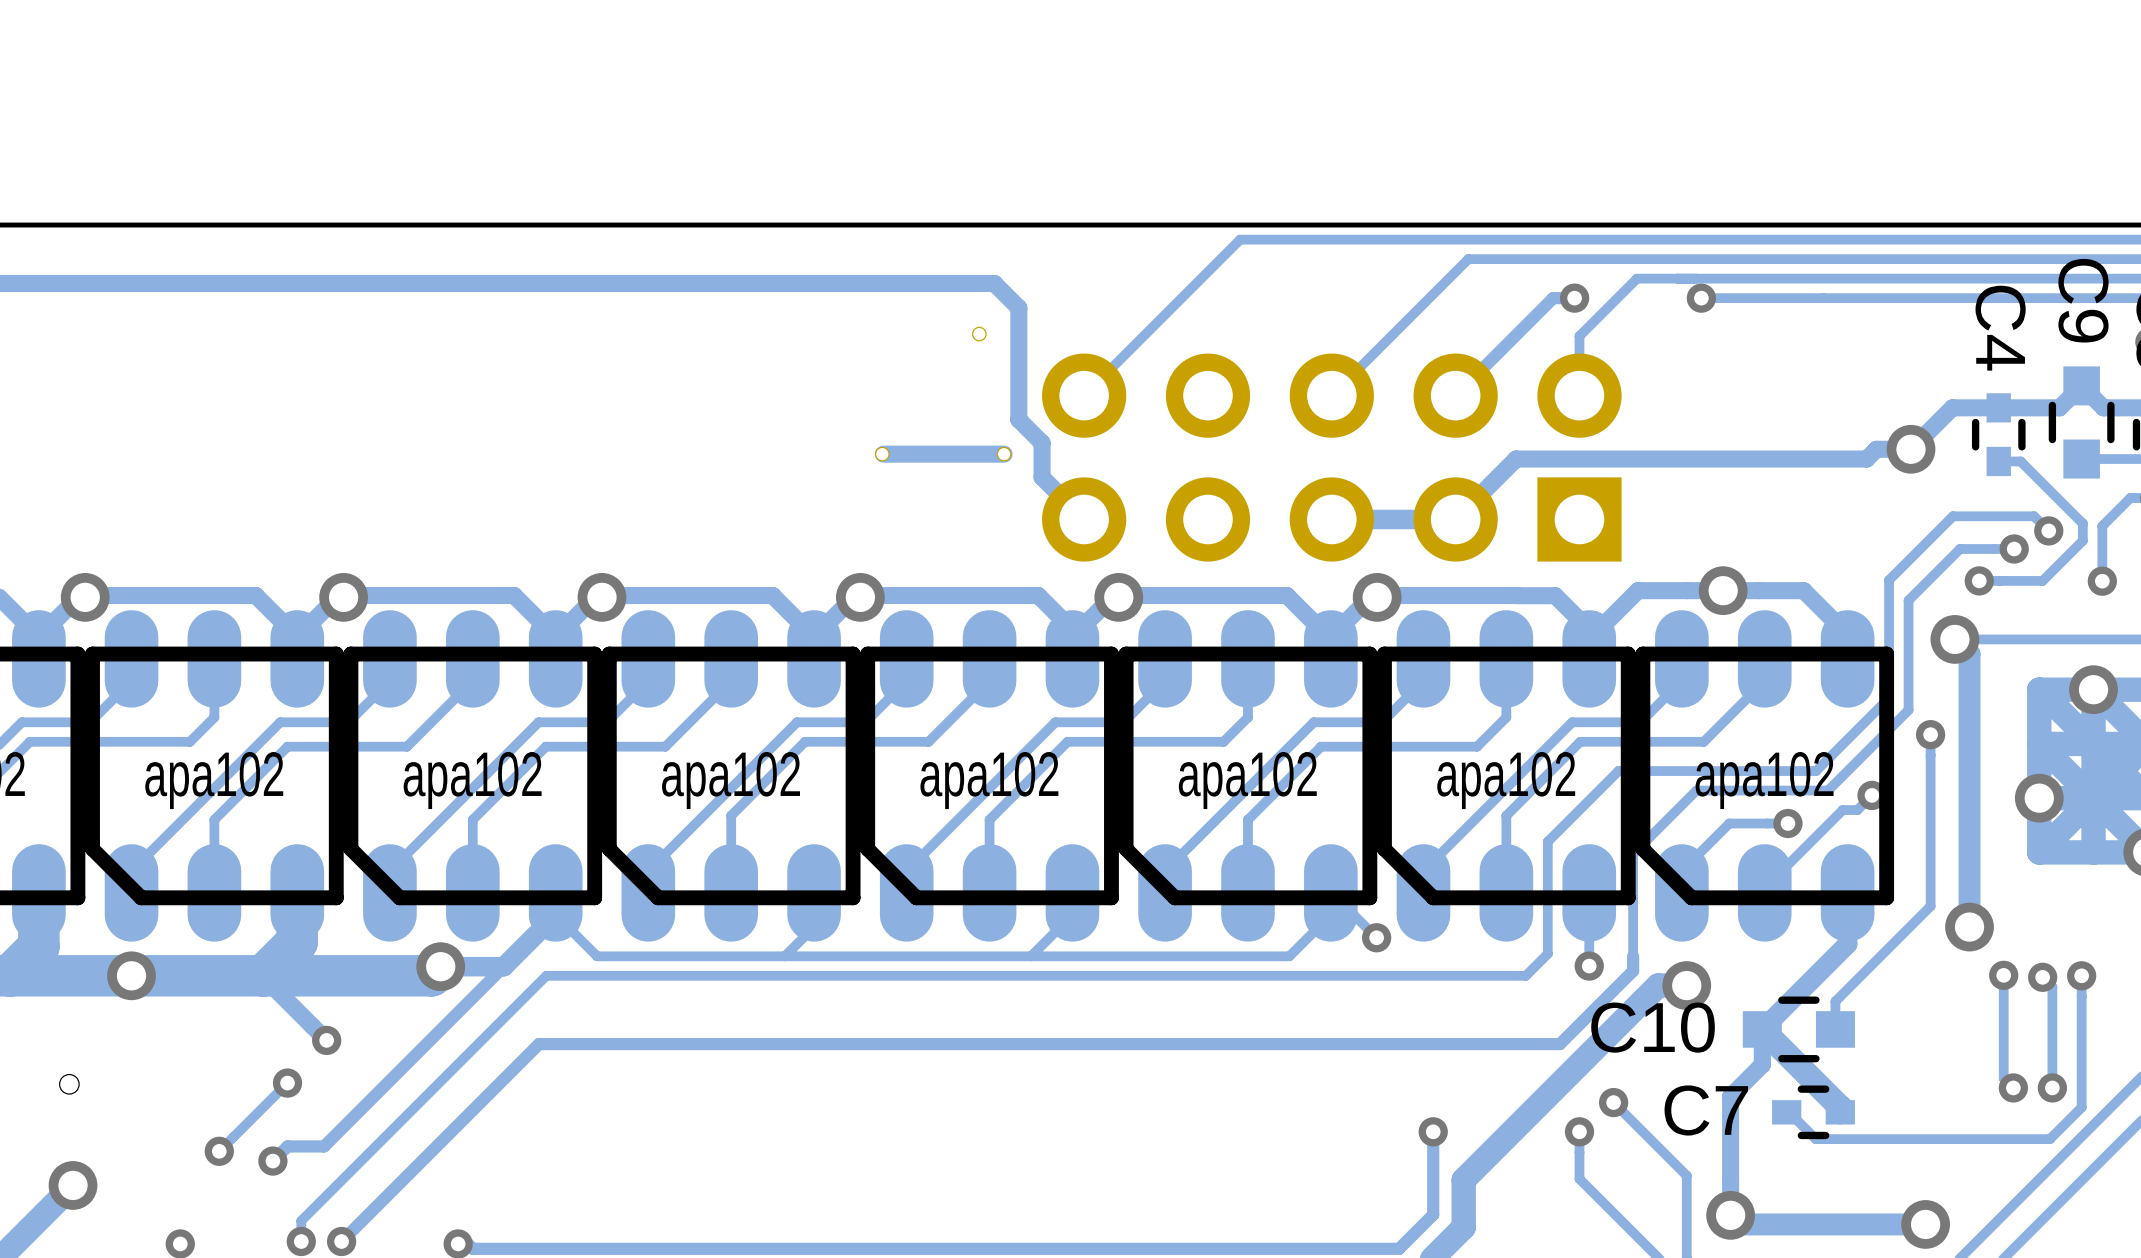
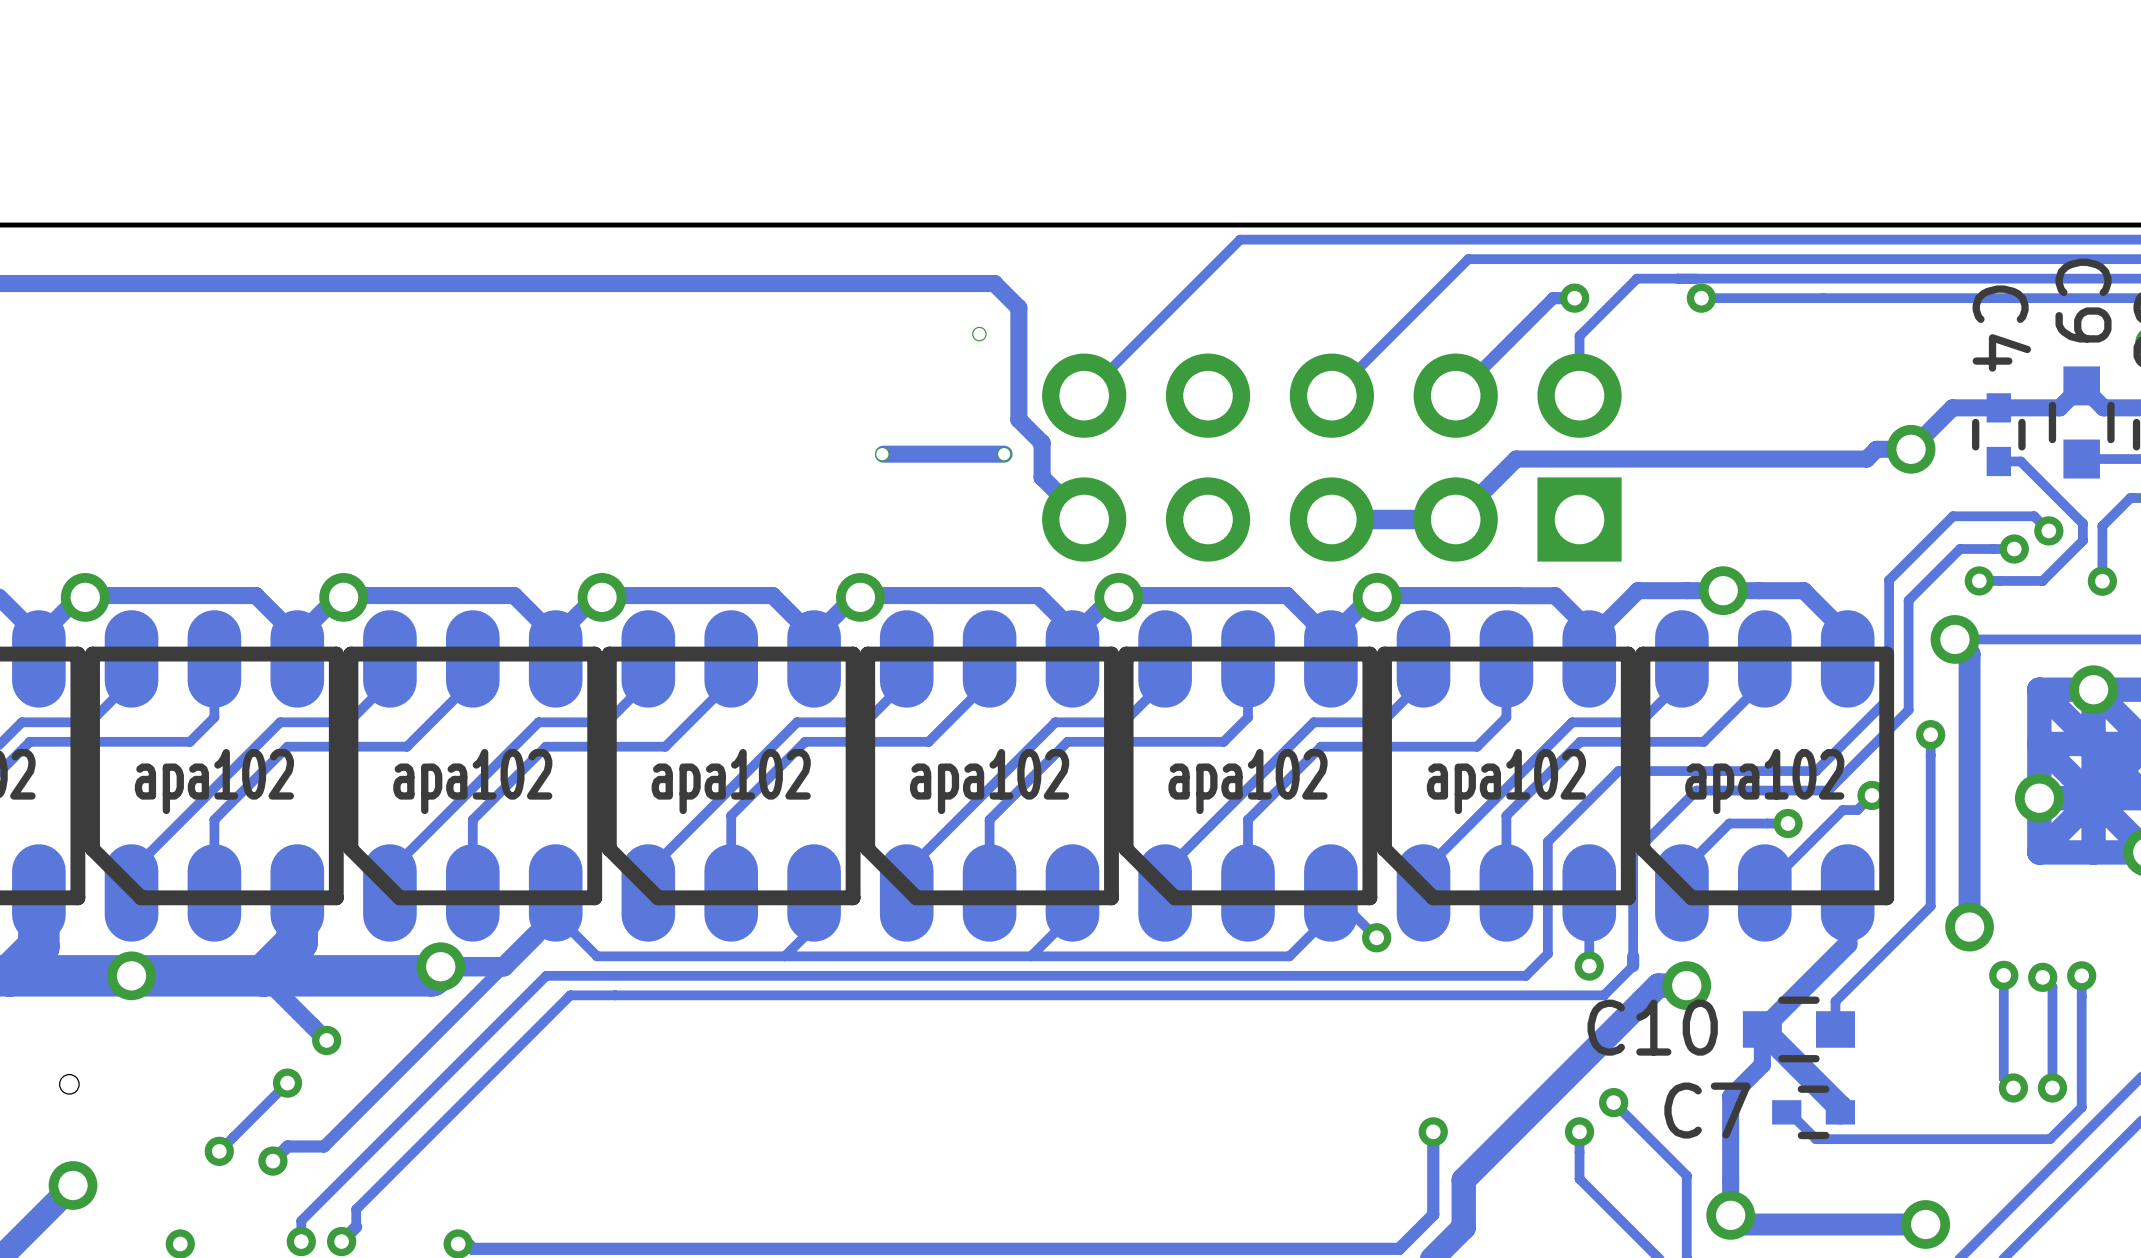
track: (1633, 966) (1633, 970) (1559, 1044) (539, 1044) (356, 1226) -> (1633, 966) (1603, 995) (570, 995) (356, 1209) (356, 1226)

